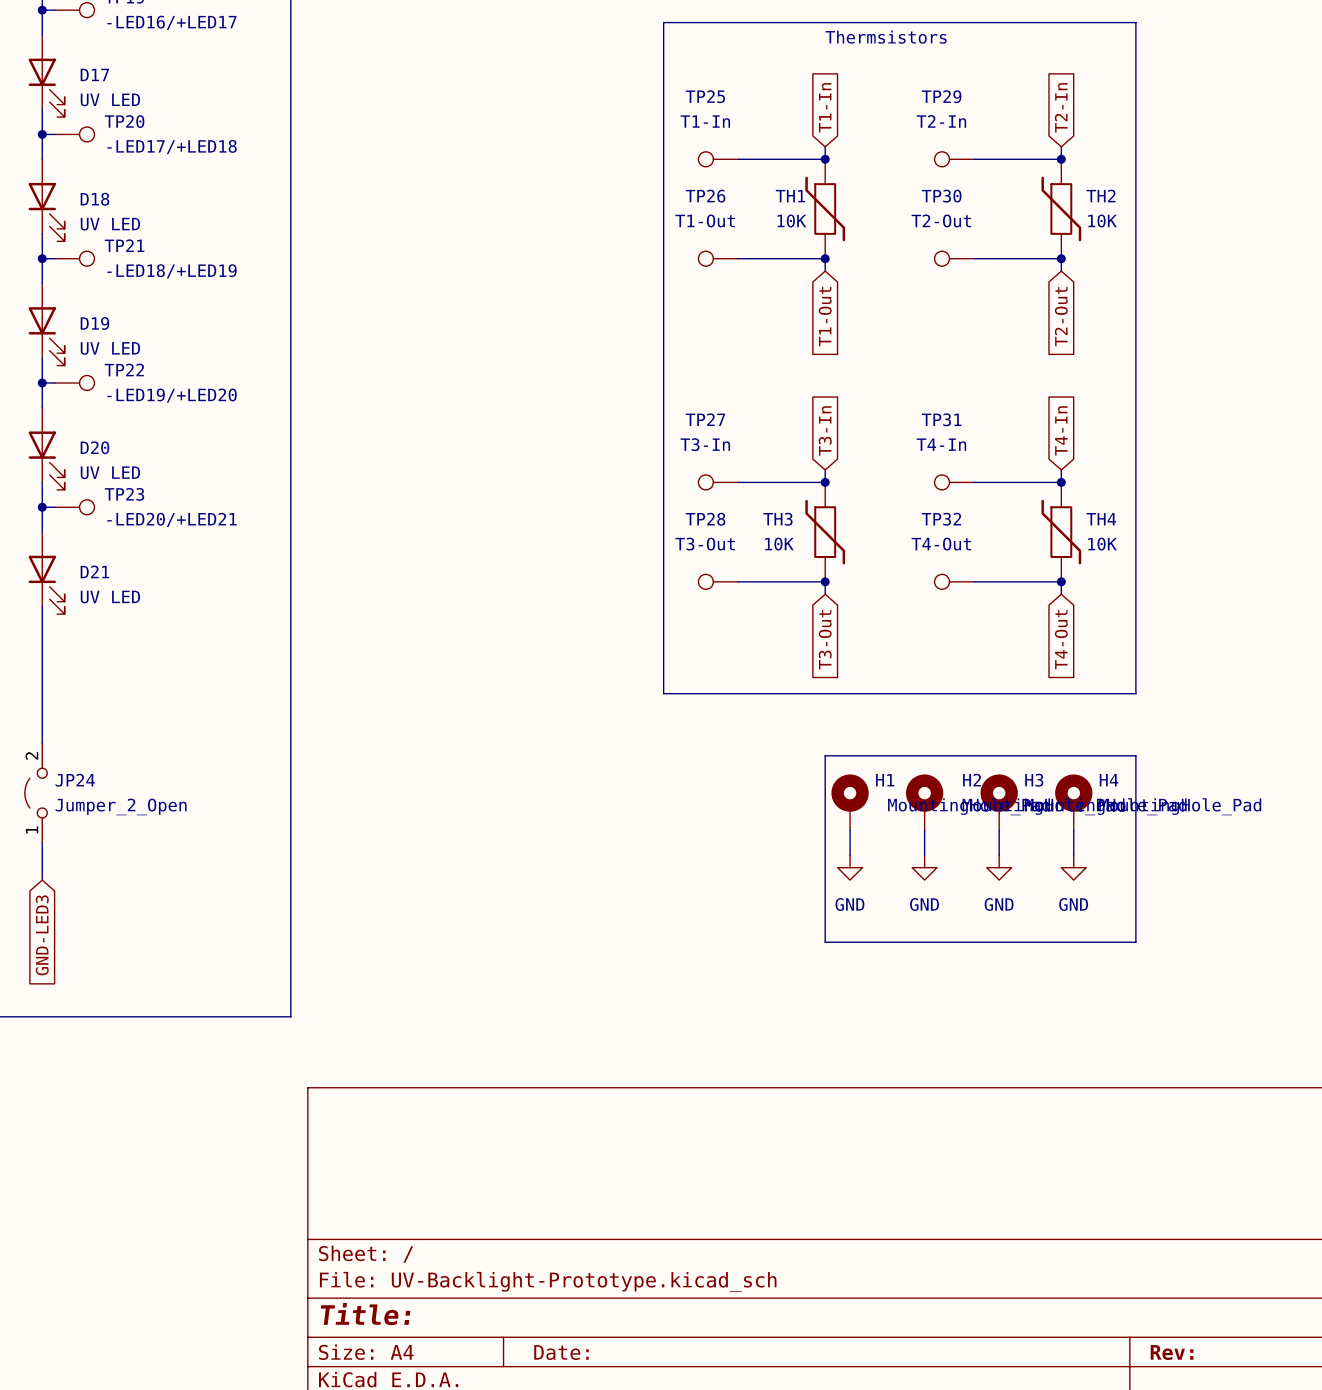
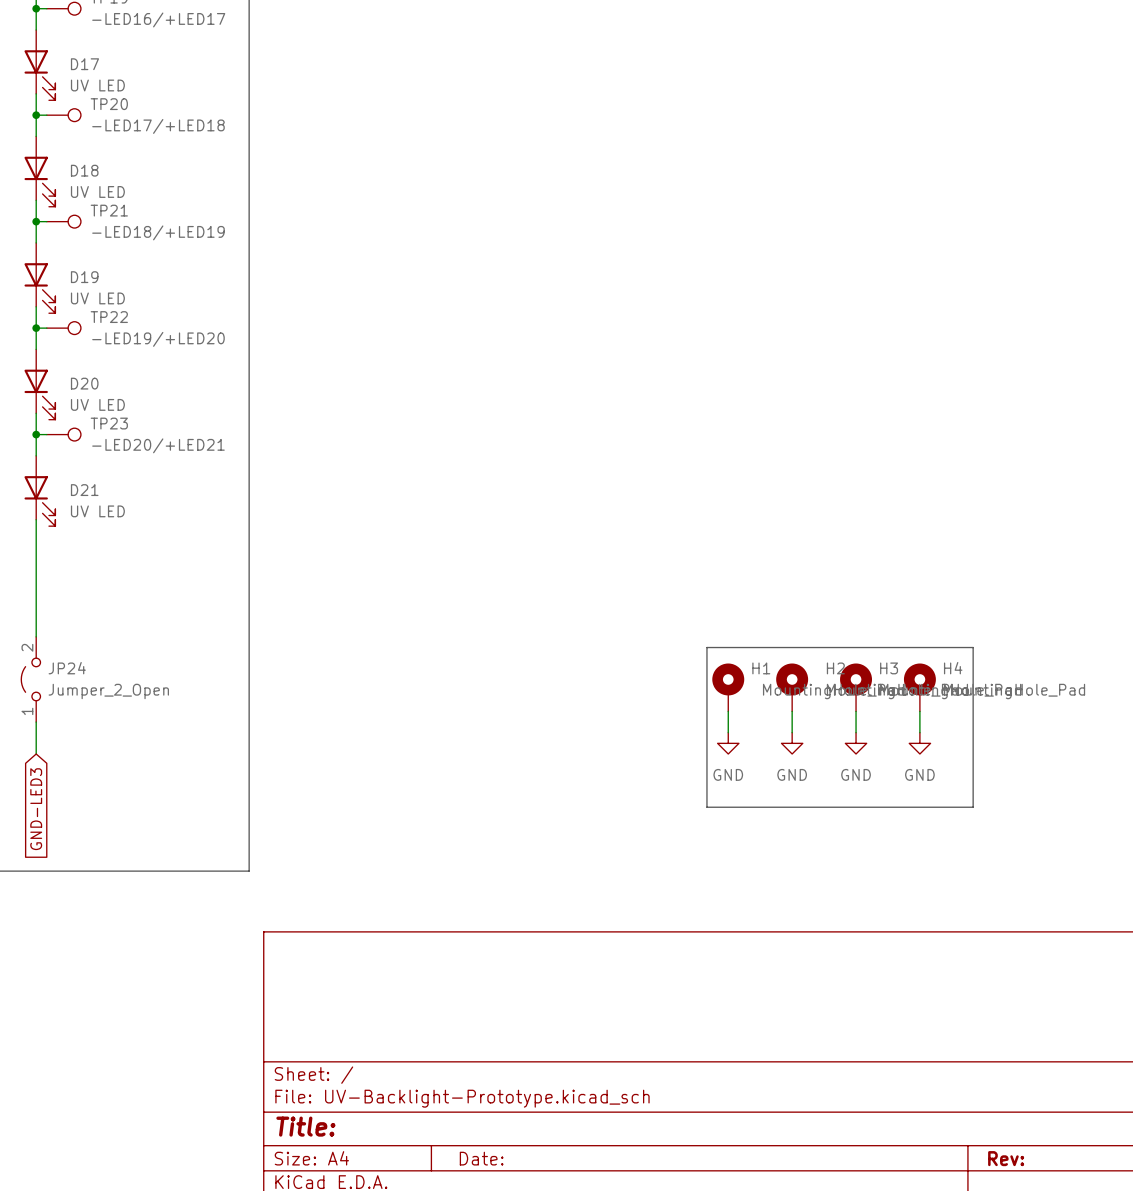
line: (663, 22) (663, 693) (1135, 693) (1135, 22) (663, 22) -> none
text: Thermsistors (886, 37) -> none
global label: T1-In (825, 107) -> none
global label: T2-In (1061, 107) -> none
wire: (825, 146) (825, 159) (738, 159) -> none
wire: (1061, 146) (1061, 159) (974, 159) -> none
TP25: T1-In (718, 159) -> none
junction: (825, 159) -> none
TP29: T2-In (954, 159) -> none
junction: (1061, 159) -> none
TH1: 10K (825, 209) -> none
TH2: 10K (1061, 209) -> none
TP26: T1-Out (718, 258) -> none
wire: (738, 258) (825, 258) (825, 271) -> none
junction: (825, 258) -> none
TP30: T2-Out (954, 258) -> none
wire: (974, 258) (1061, 258) (1061, 271) -> none
junction: (1061, 258) -> none
global label: T1-Out (825, 316) -> none
global label: T2-Out (1061, 316) -> none
global label: T3-In (825, 430) -> none
global label: T4-In (1061, 430) -> none
wire: (825, 469) (825, 482) (738, 482) -> none
wire: (1061, 469) (1061, 482) (974, 482) -> none
TP27: T3-In (718, 482) -> none
junction: (825, 482) -> none
TP31: T4-In (954, 482) -> none
junction: (1061, 482) -> none
TH3: 10K (825, 532) -> none
TH4: 10K (1061, 532) -> none
TP28: T3-Out (718, 581) -> none
wire: (738, 581) (825, 581) (825, 594) -> none
junction: (825, 581) -> none
TP32: T4-Out (954, 581) -> none
wire: (974, 581) (1061, 581) (1061, 594) -> none
junction: (1061, 581) -> none
global label: T3-Out (825, 639) -> none
global label: T4-Out (1061, 639) -> none

